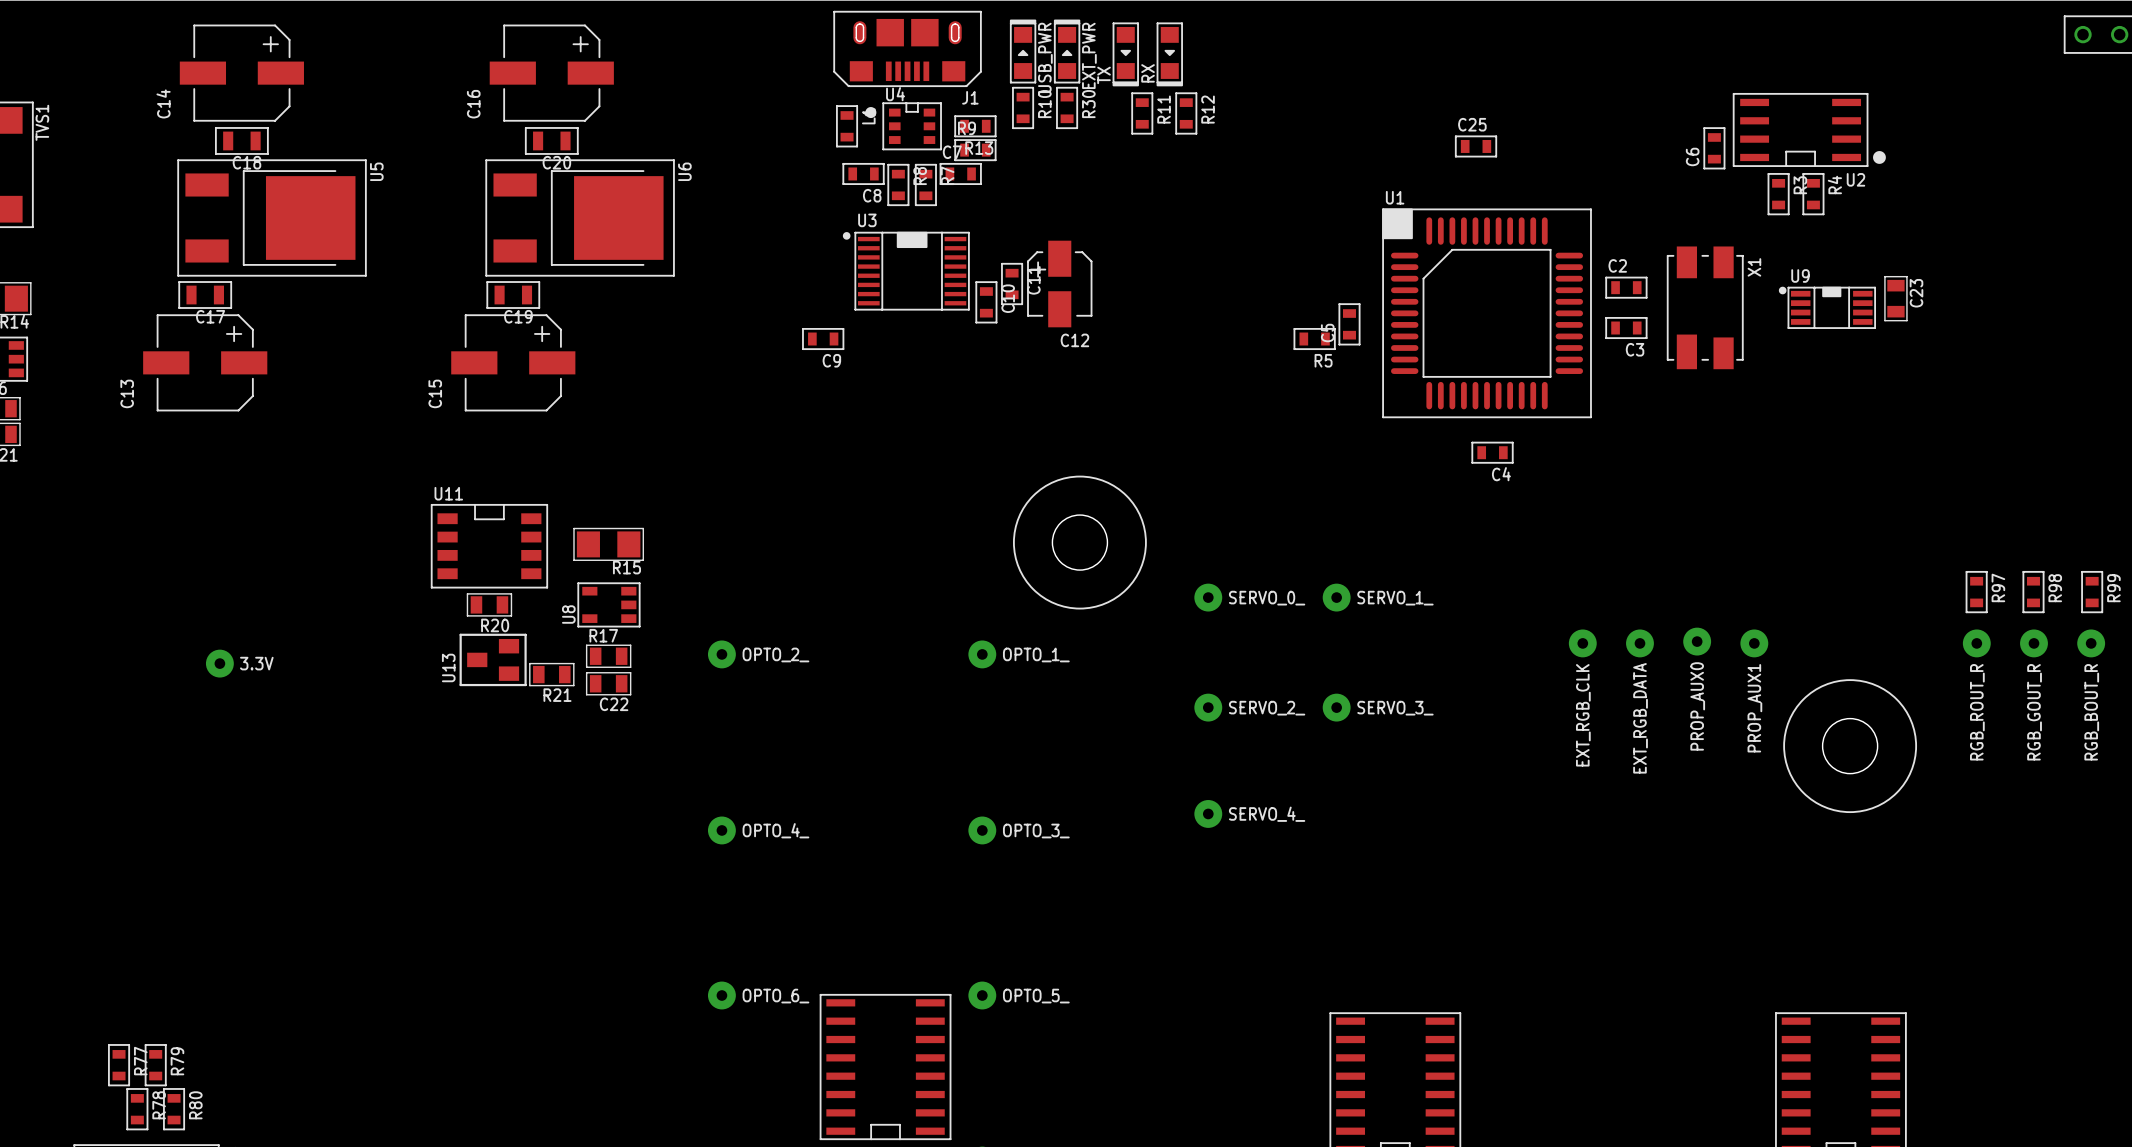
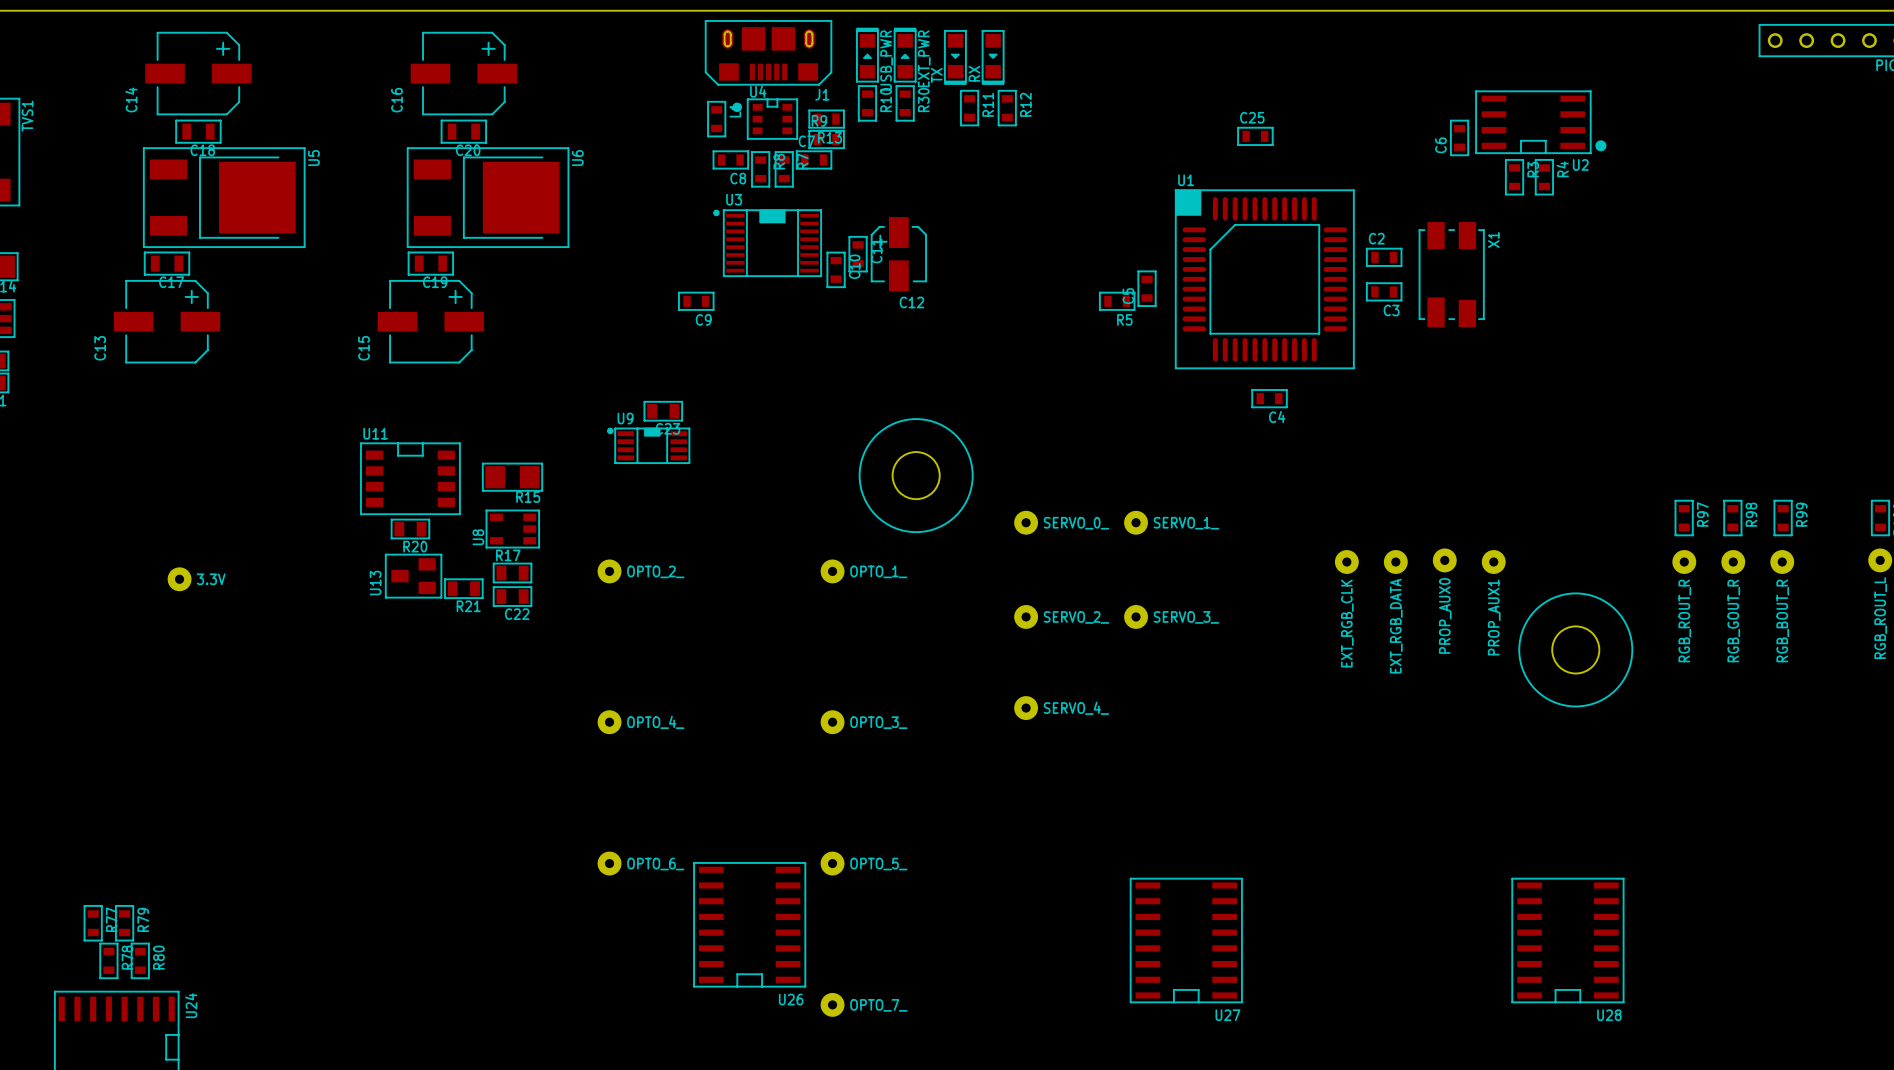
C23 rotation: 0° (1895, 298) -> 90° clockwise (663, 411)
C23 position: (1895, 298) -> (663, 411)
U9 position: (1827, 307) -> (648, 445)

